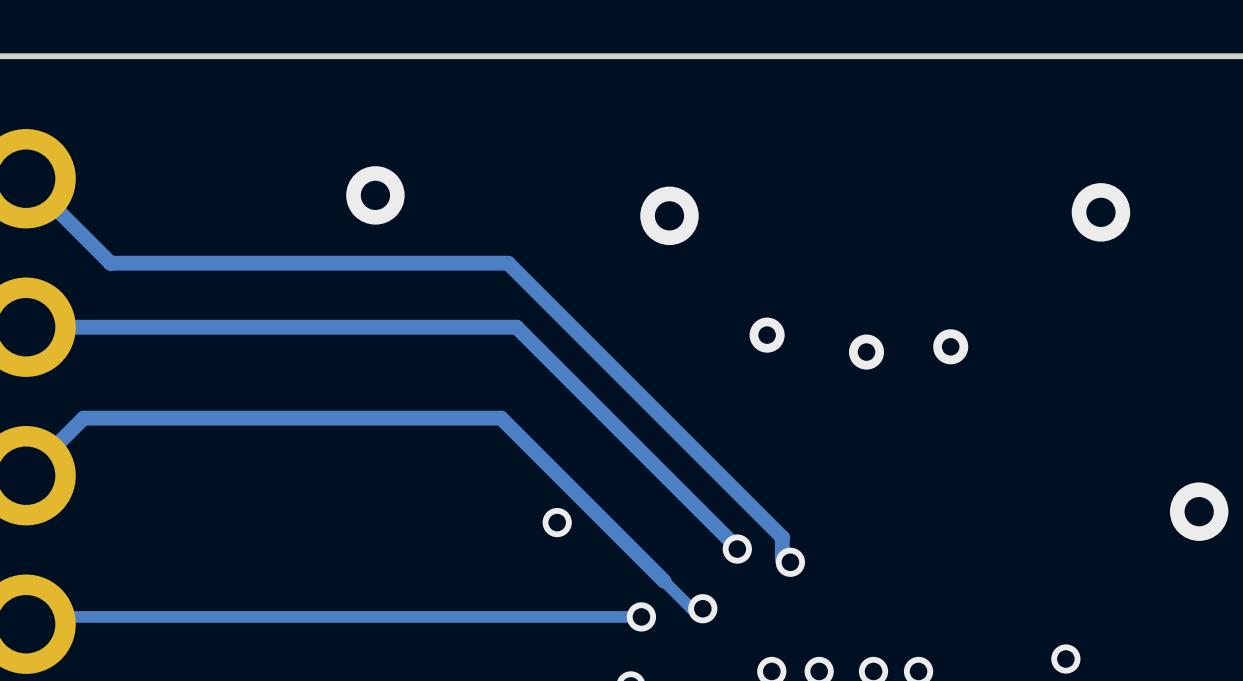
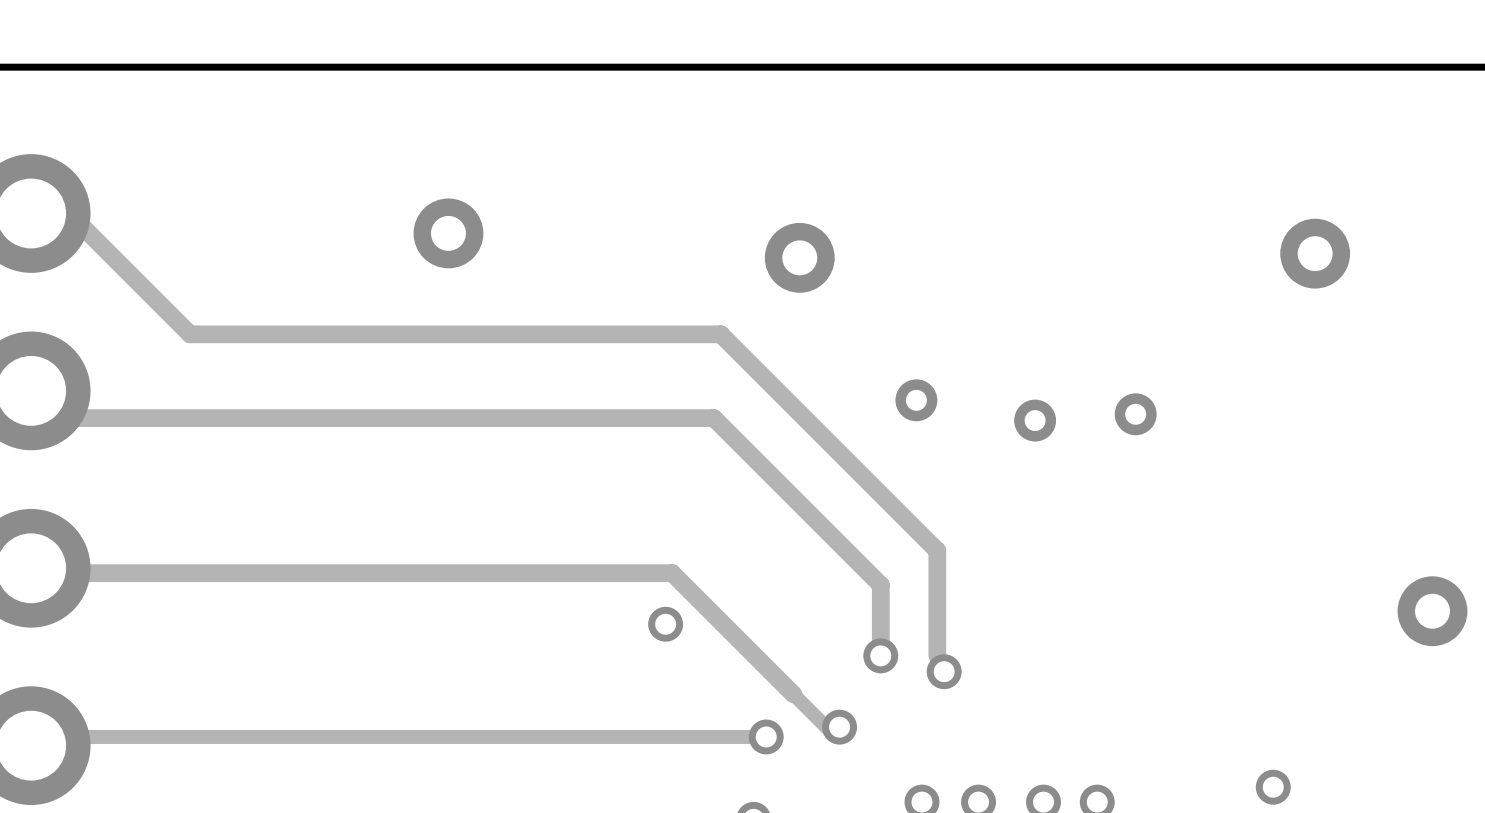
track: (26, 178) (110, 263) (508, 263) (782, 537) (782, 559) (787, 559) -> (31, 213) (69, 213) (190, 334) (720, 334) (937, 550) (937, 664) (940, 668)
track: (26, 327) (516, 327) (737, 547) -> (31, 390) (58, 418) (713, 418) (880, 585) (880, 654)
track: (26, 475) (83, 418) (501, 418) (562, 479) -> (31, 568) (36, 573) (672, 573)

